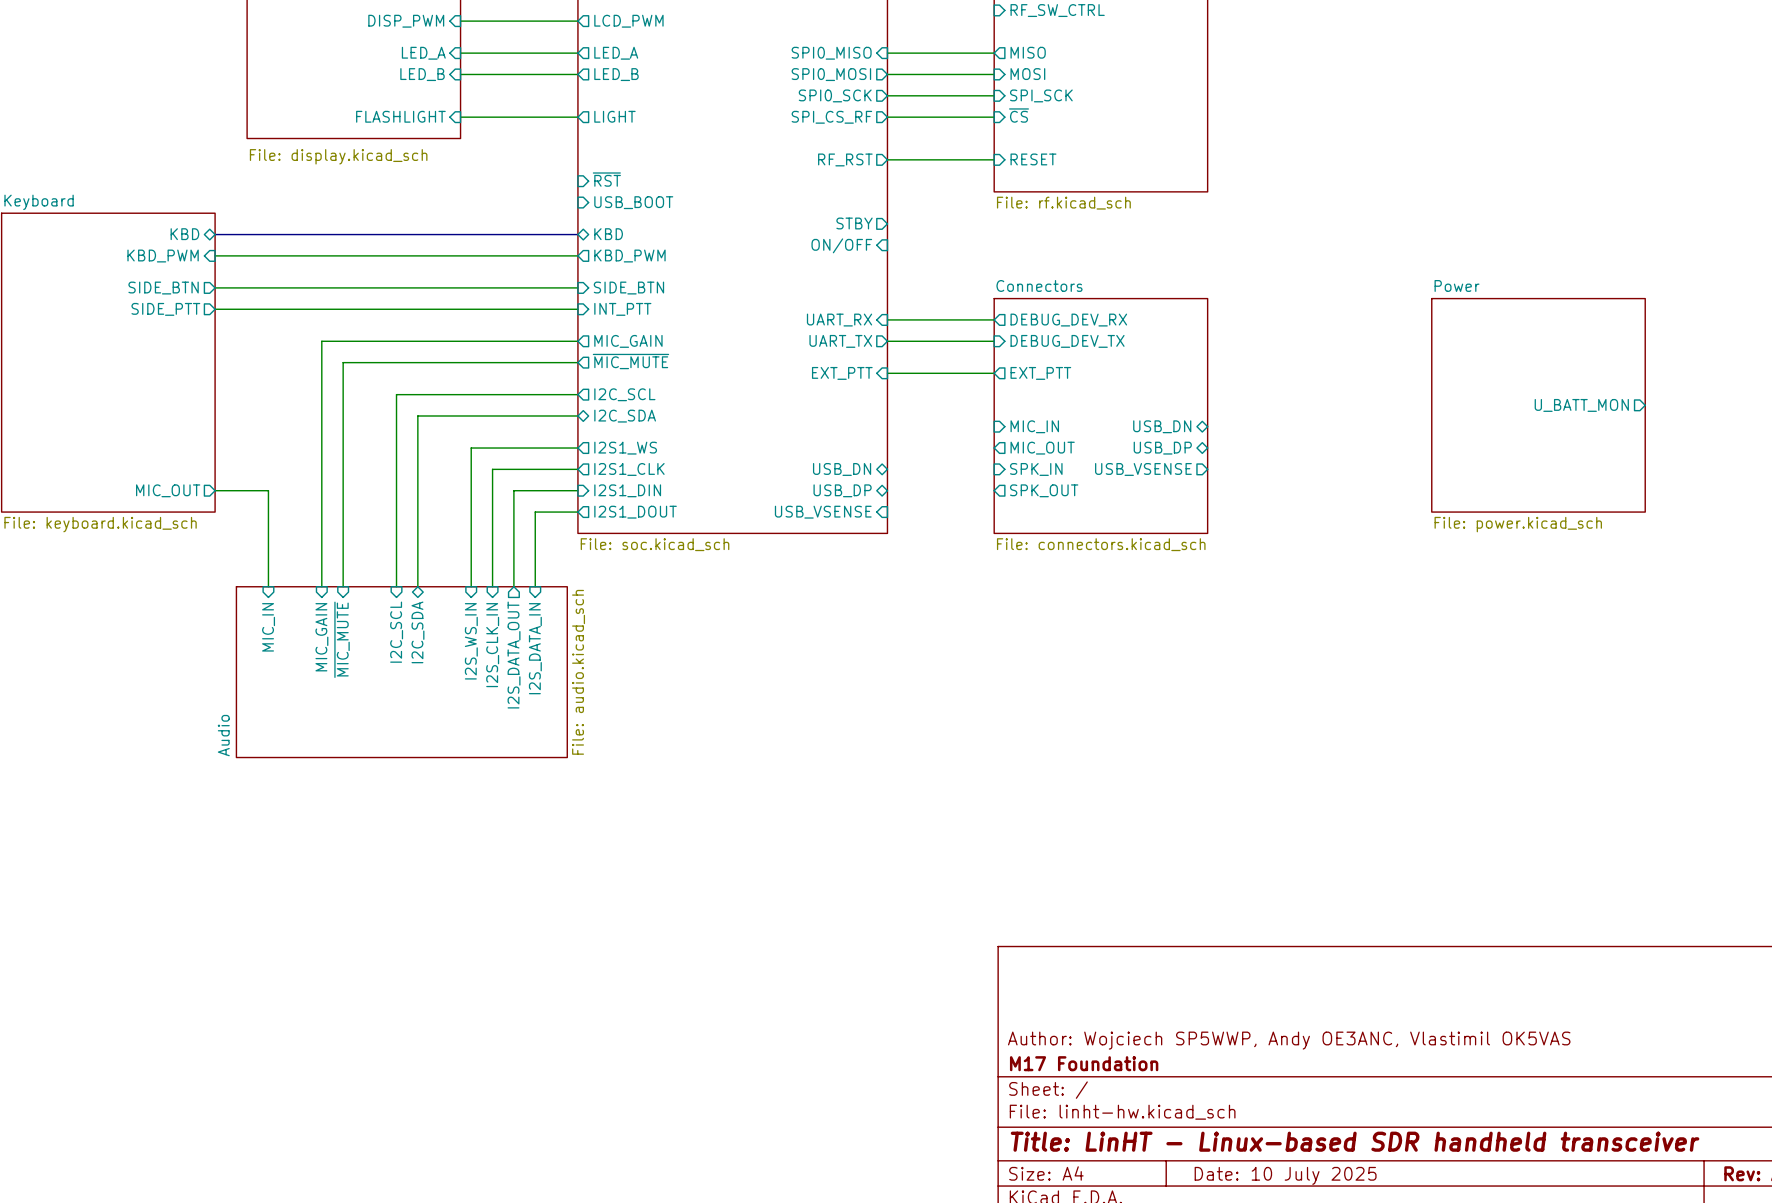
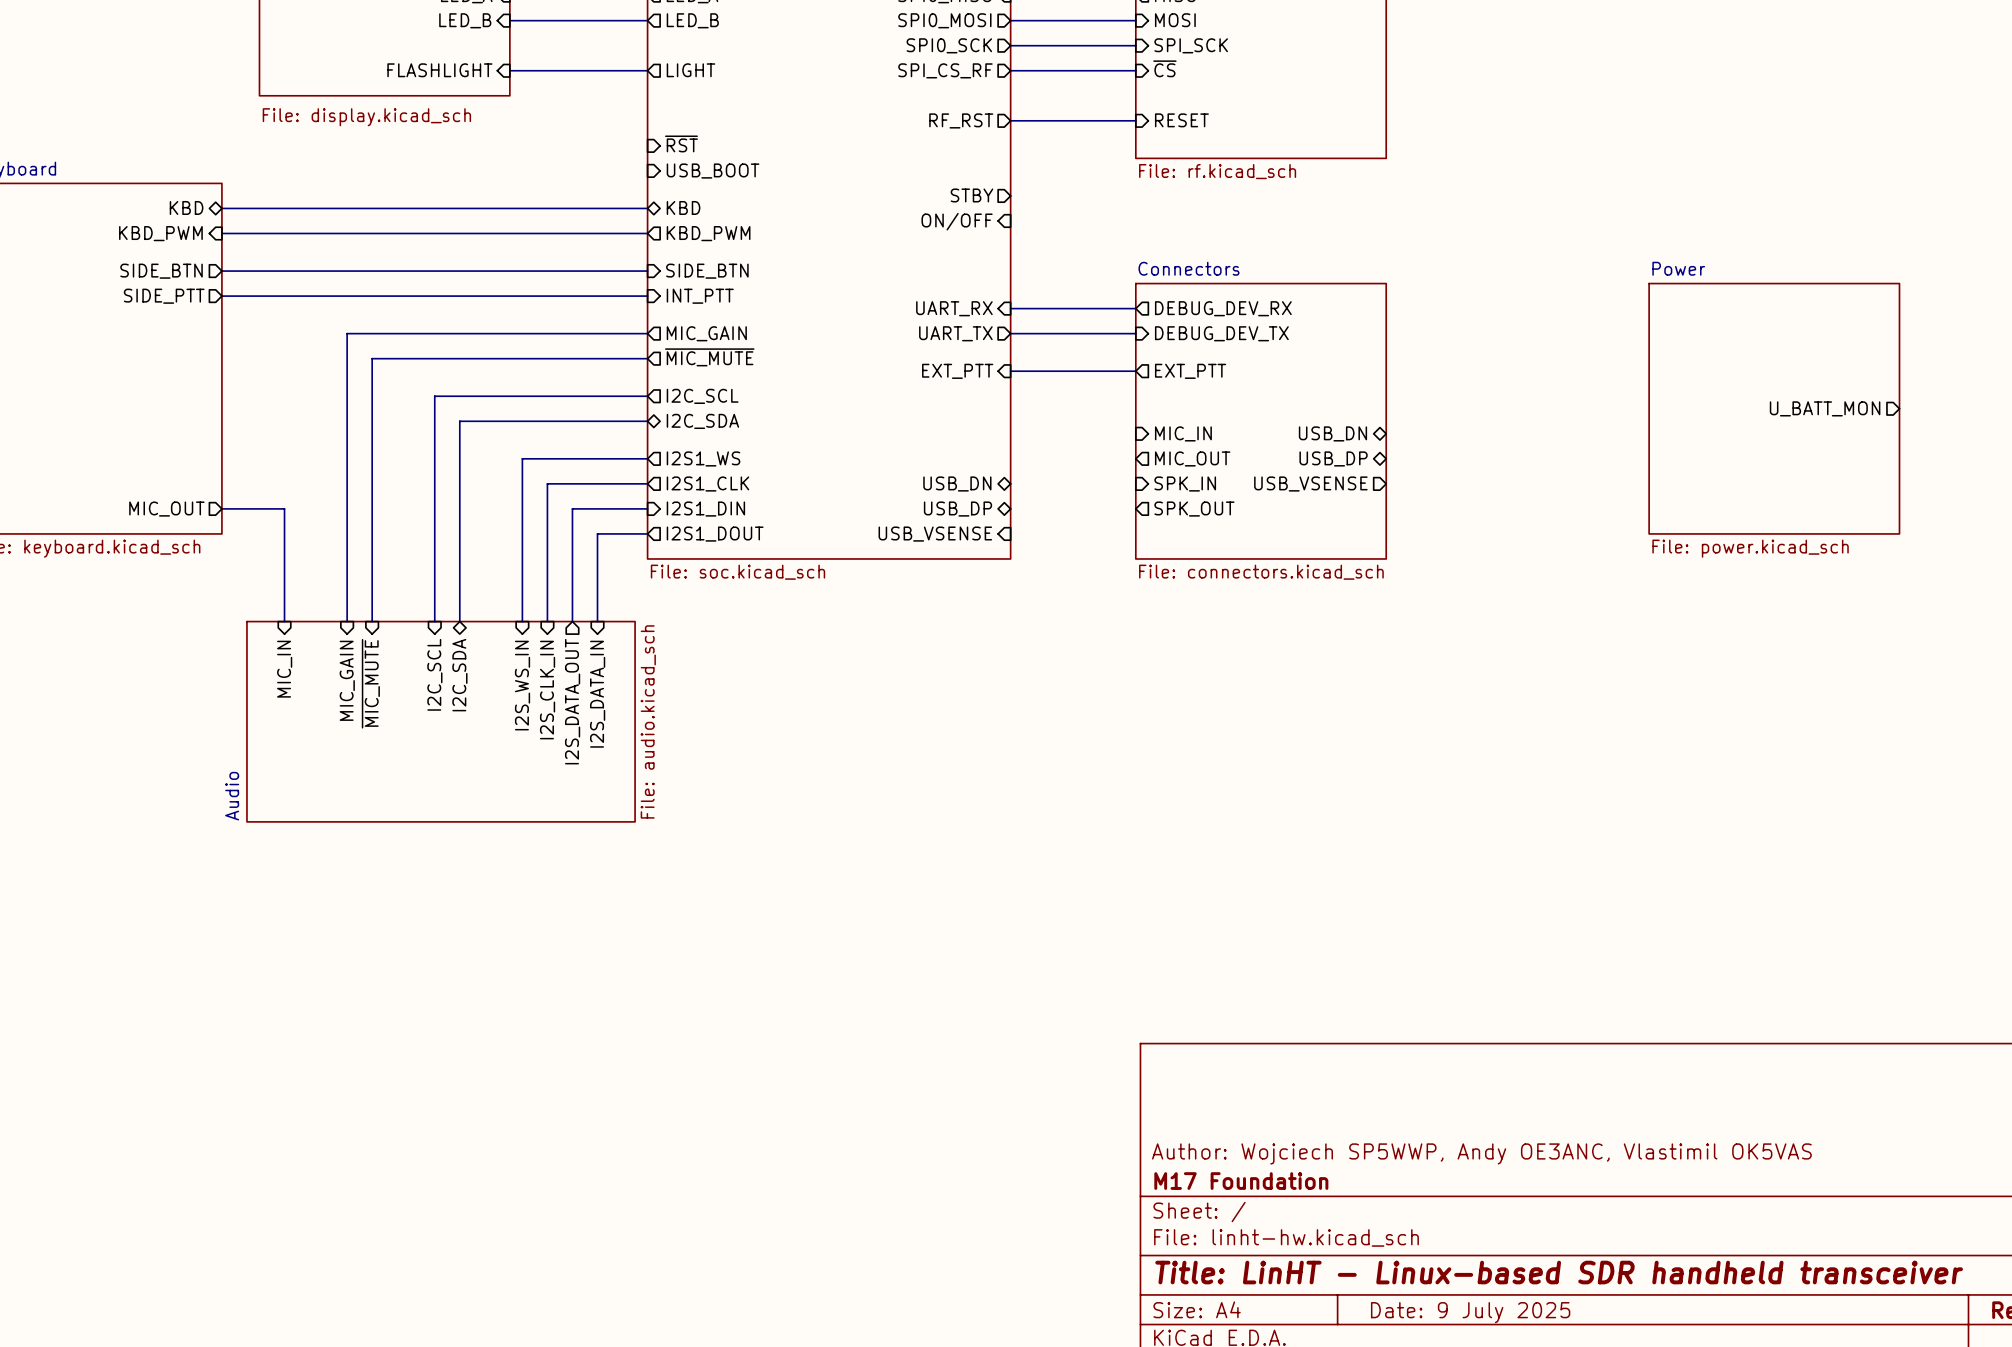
title block: Date: 10 July 2025 (1285, 1175) -> Date: 9 July 2025 (1470, 1312)

